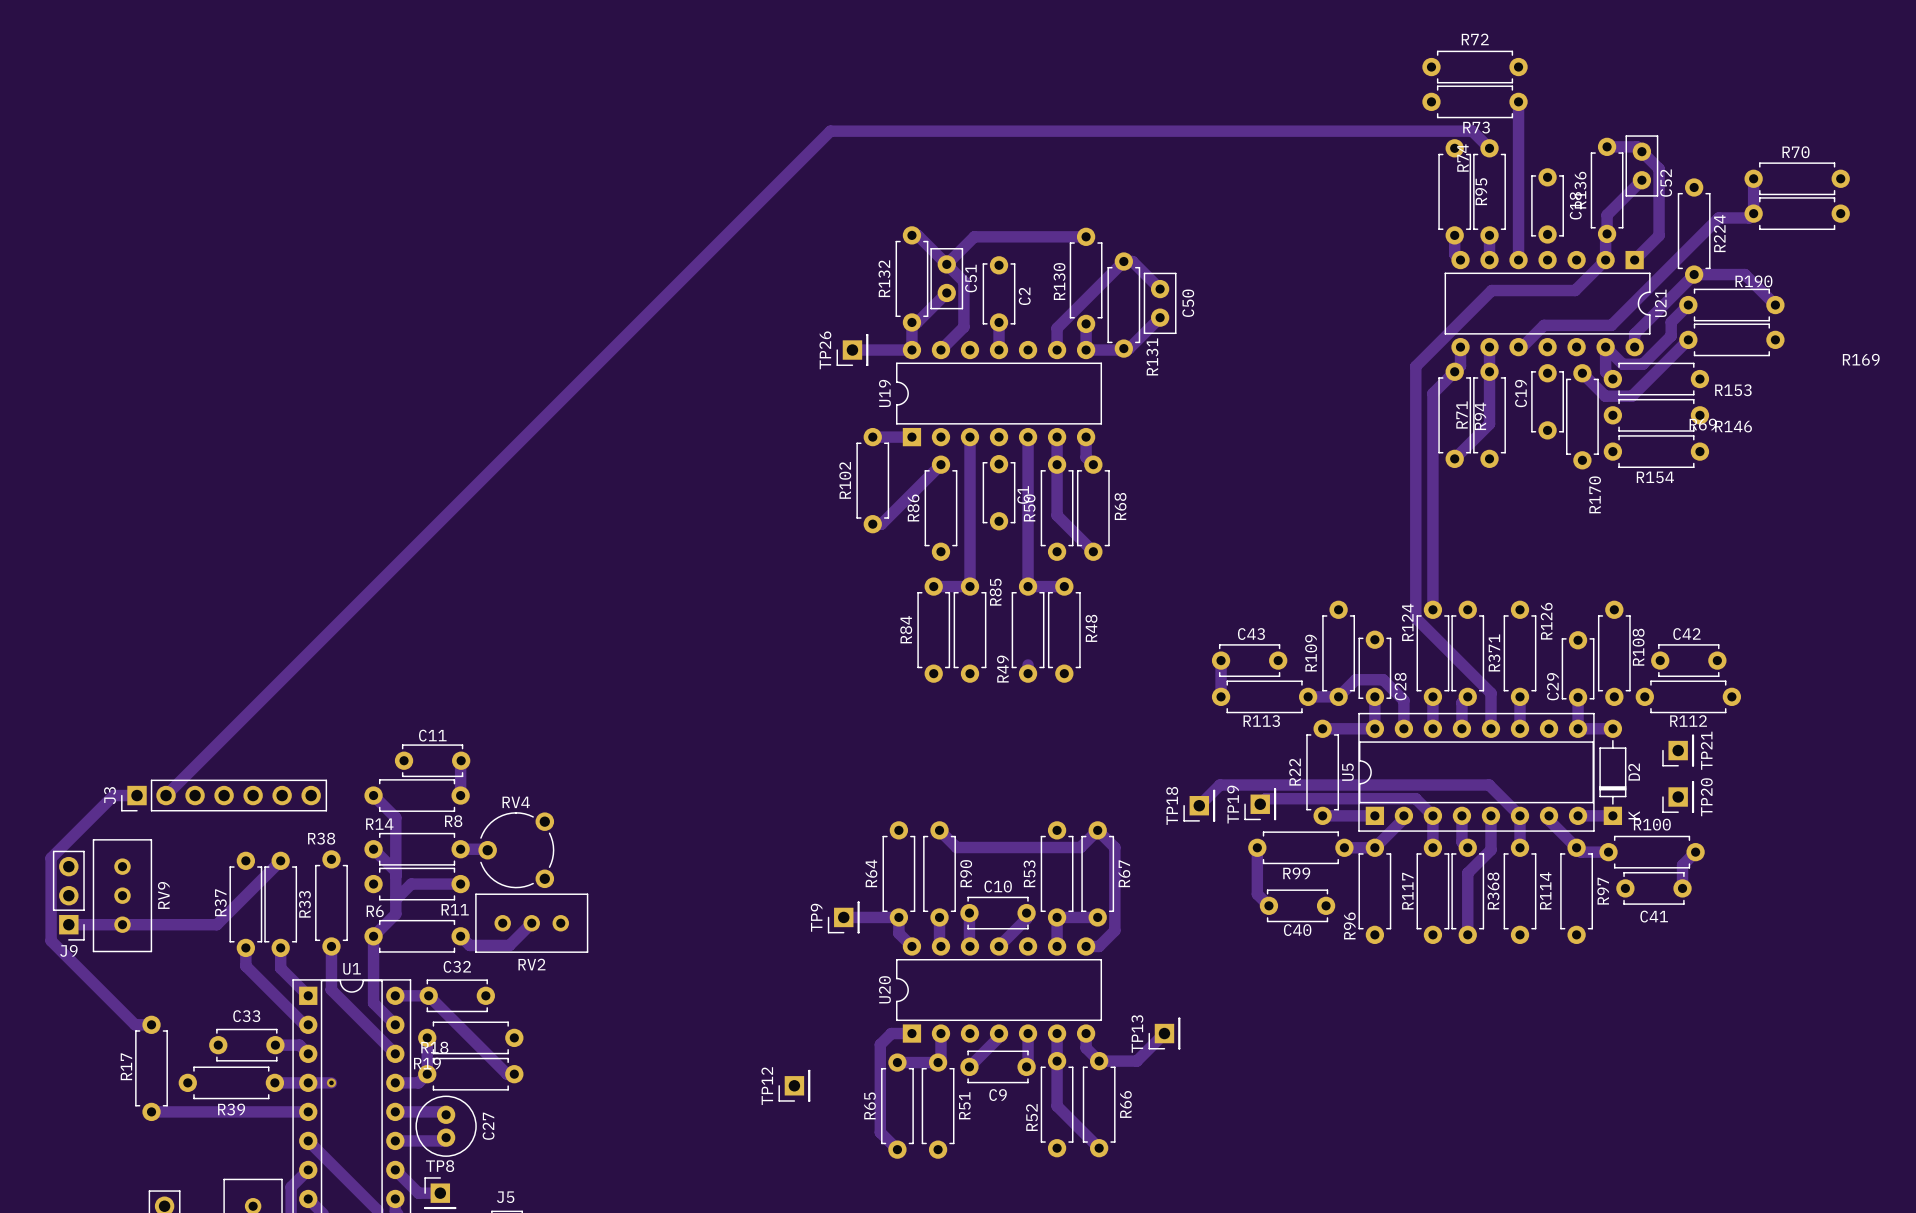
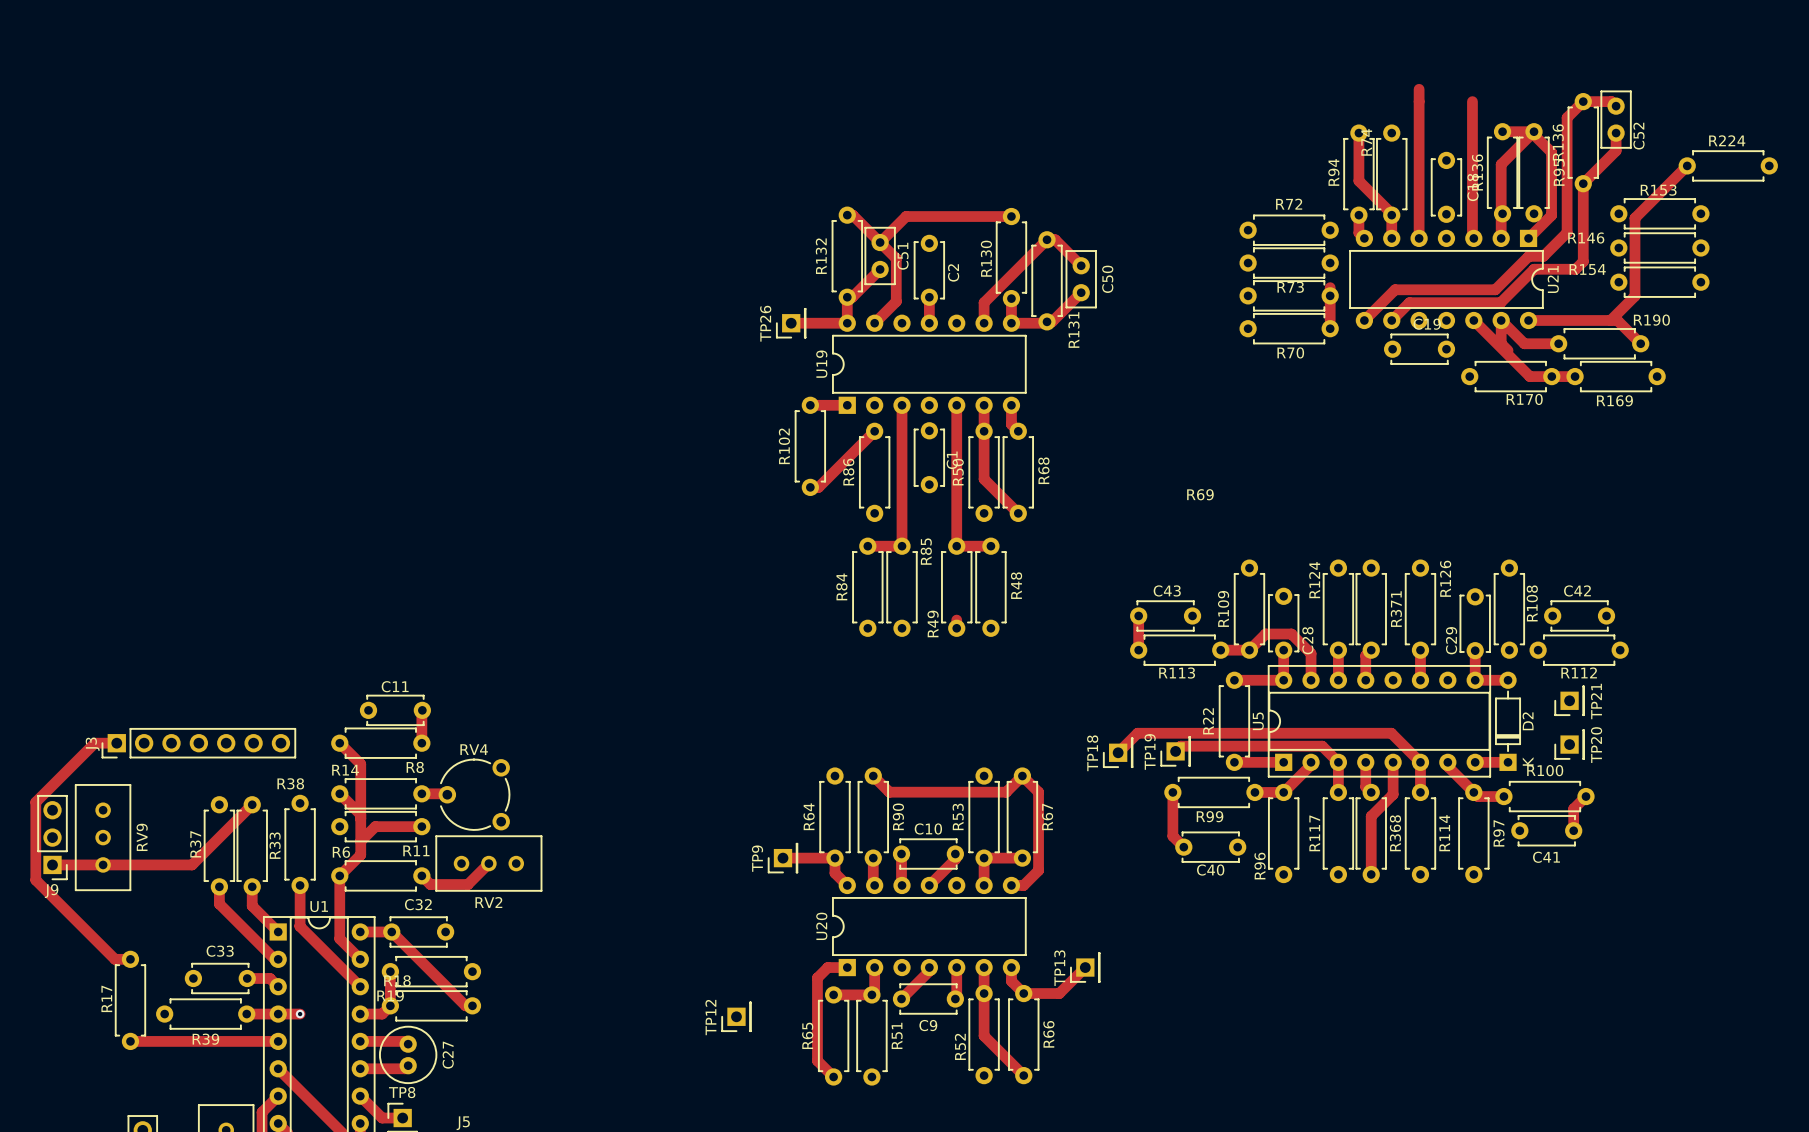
R72 position: (1475, 67) -> (1289, 230)
R73 position: (1475, 101) -> (1289, 263)
track: none -> (1472, 101) (1473, 238)
track: none -> (1358, 131) (1358, 180) (1391, 215)
track: (1489, 148) (1472, 131) (830, 131) (166, 795) -> none
R70 name position: R70 (1796, 152) -> R70 (1290, 352)
R136: none -> (1583, 142)
C52 position: (1641, 165) -> (1616, 119)
track: (1753, 178) (1753, 213) (1749, 217) (1718, 217) (1611, 325) (1543, 325) (1522, 347) (1518, 347) -> none
R70 position: (1797, 178) -> (1289, 328)
track: (1641, 180) (1607, 215) (1605, 235) -> (1534, 131) (1501, 164) (1501, 215)
track: none -> (1687, 165) (1634, 218) (1634, 296) (1610, 320)
R95: none -> (1534, 172)
R95 name: R95 (1481, 191) -> R94 (1333, 172)
R69 position: (1797, 213) -> (1289, 295)
R224 rotation: 0° (1694, 231) -> 90° clockwise (1728, 165)
R224 position: (1694, 231) -> (1728, 165)
R224 name position: R224 (1719, 233) -> R224 (1727, 140)
track: (1605, 260) (1575, 290) (1491, 290) (1415, 366) (1415, 618) (1490, 693) (1490, 728) -> none
R190 name position: R190 (1753, 281) -> R190 (1651, 320)
track: (1688, 305) (1671, 322) (1671, 335) (1642, 364) (1622, 364) -> (1558, 343) (1524, 343) (1517, 336)
R190 position: (1731, 305) -> (1599, 343)
track: (1775, 305) (1744, 274) (1694, 274) (1634, 334) (1634, 347) -> (1640, 343) (1617, 320) (1528, 320)
track: none -> (1330, 287) (1330, 320)
track: (1688, 339) (1632, 396) (1605, 396) (1582, 373) -> none
R169 position: (1731, 339) -> (1616, 376)
track: (1460, 347) (1460, 365) (1432, 393) (1432, 609) -> (1364, 320) (1395, 289) (1495, 289) (1528, 256) (1543, 256) (1567, 232) (1567, 117) (1583, 101) (1611, 101) (1616, 106)
track: (1489, 347) (1489, 424) (1454, 458) -> (1391, 320) (1409, 302) (1500, 302) (1534, 269) (1575, 269) (1583, 261) (1583, 183) (1616, 150) (1616, 133)
track: none -> (1473, 320) (1529, 376) (1575, 376)
R169 name position: R169 (1861, 359) -> R169 (1614, 400)
R153 position: (1656, 379) -> (1659, 213)
R153 name position: R153 (1733, 390) -> R153 (1658, 190)
C19 rotation: 0° (1547, 401) -> 90° clockwise (1419, 349)
R94: (1454, 415) -> none
R71: (1489, 415) -> none
R146 position: (1656, 415) -> (1659, 247)
R170 rotation: 0° (1582, 416) -> 90° clockwise (1510, 376)
R146 name position: R146 (1733, 426) -> R146 (1586, 238)
R154 position: (1656, 451) -> (1659, 282)
R154 name position: R154 (1655, 477) -> R154 (1587, 269)
R170 name position: R170 (1595, 494) -> R170 (1524, 399)

